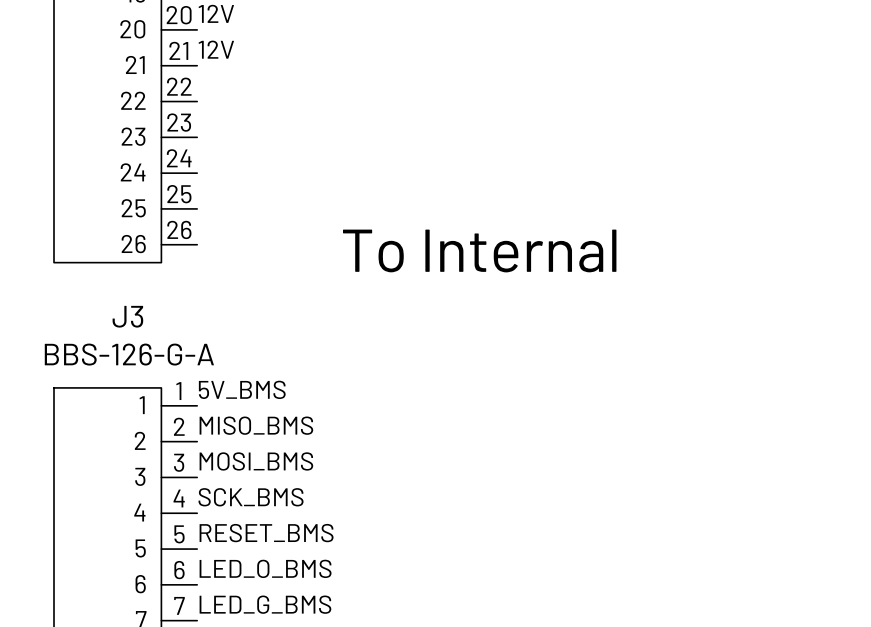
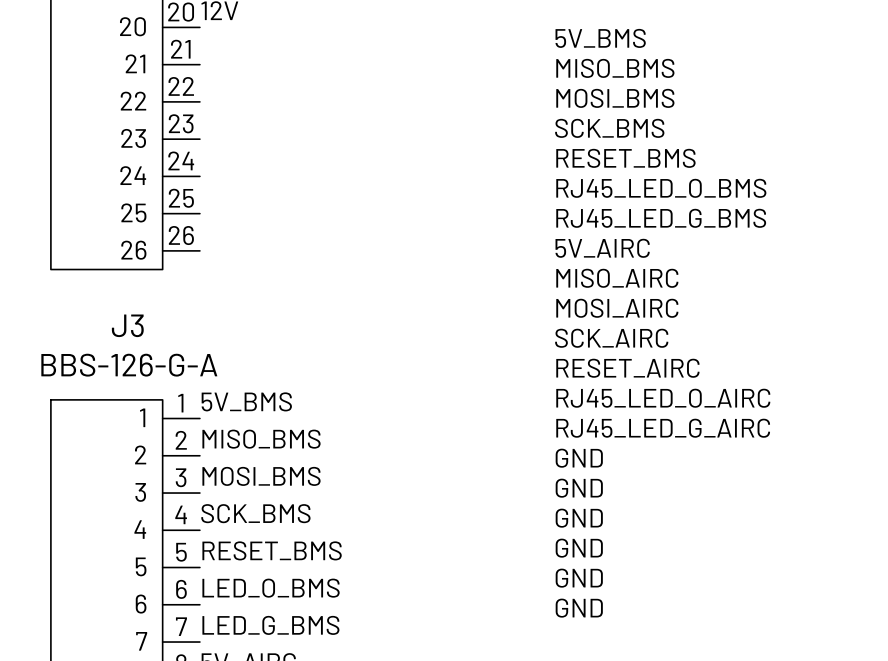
text: none -> 5V_BMS (600, 38)
label: 12V (216, 49) -> none
text: none -> MISO_BMS (615, 68)
text: none -> MOSI_BMS (615, 98)
text: none -> SCK_BMS (609, 128)
text: none -> RESET_BMS (625, 158)
text: none -> RJ45_LED_O_BMS (661, 188)
text: none -> RJ45_LED_G_BMS (661, 218)
text: none -> 5V_AIRC (602, 248)
text: To Internal (479, 251) -> none
text: none -> MISO_AIRC (617, 278)
text: none -> MOSI_AIRC (617, 308)
text: none -> SCK_AIRC (611, 338)
text: none -> RESET_AIRC (627, 368)
text: none -> RJ45_LED_O_AIRC (663, 398)
text: none -> RJ45_LED_G_AIRC (663, 428)
text: none -> GND (579, 458)
text: none -> GND (579, 488)
text: none -> GND (579, 518)
text: none -> GND (579, 548)
text: none -> GND (579, 578)
text: none -> GND (579, 608)

